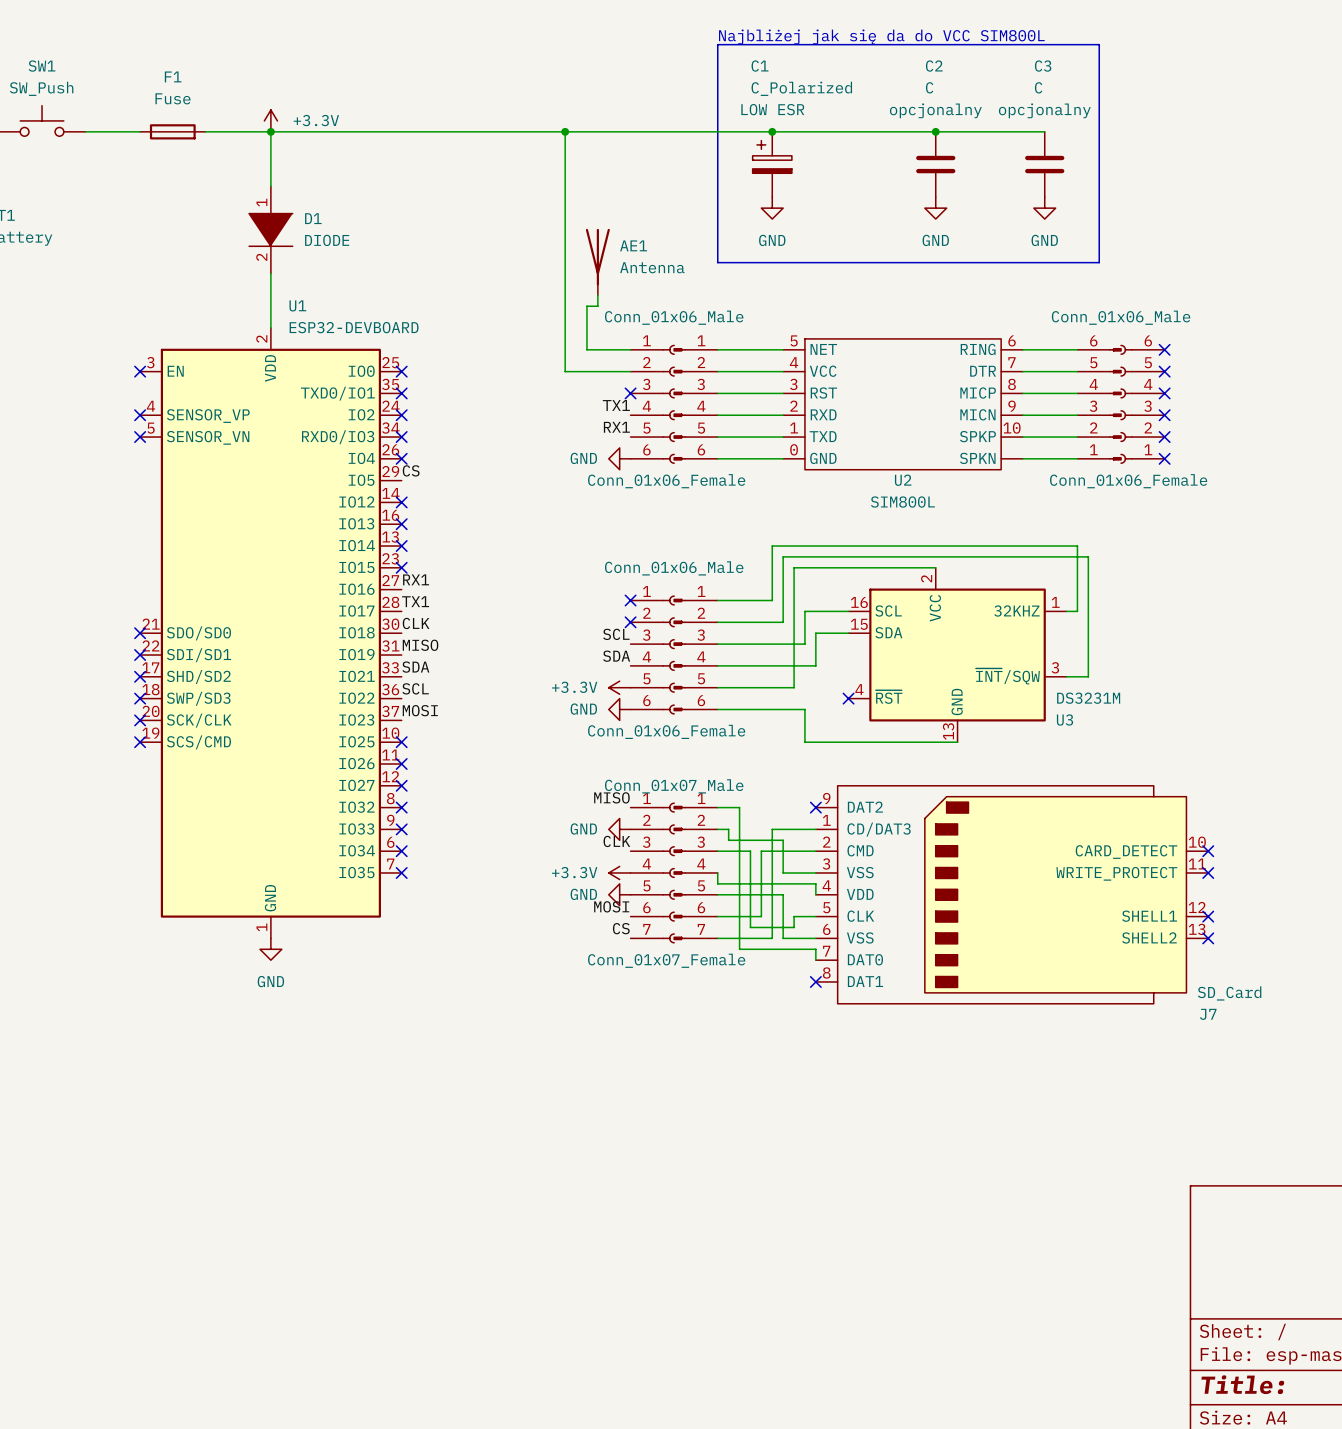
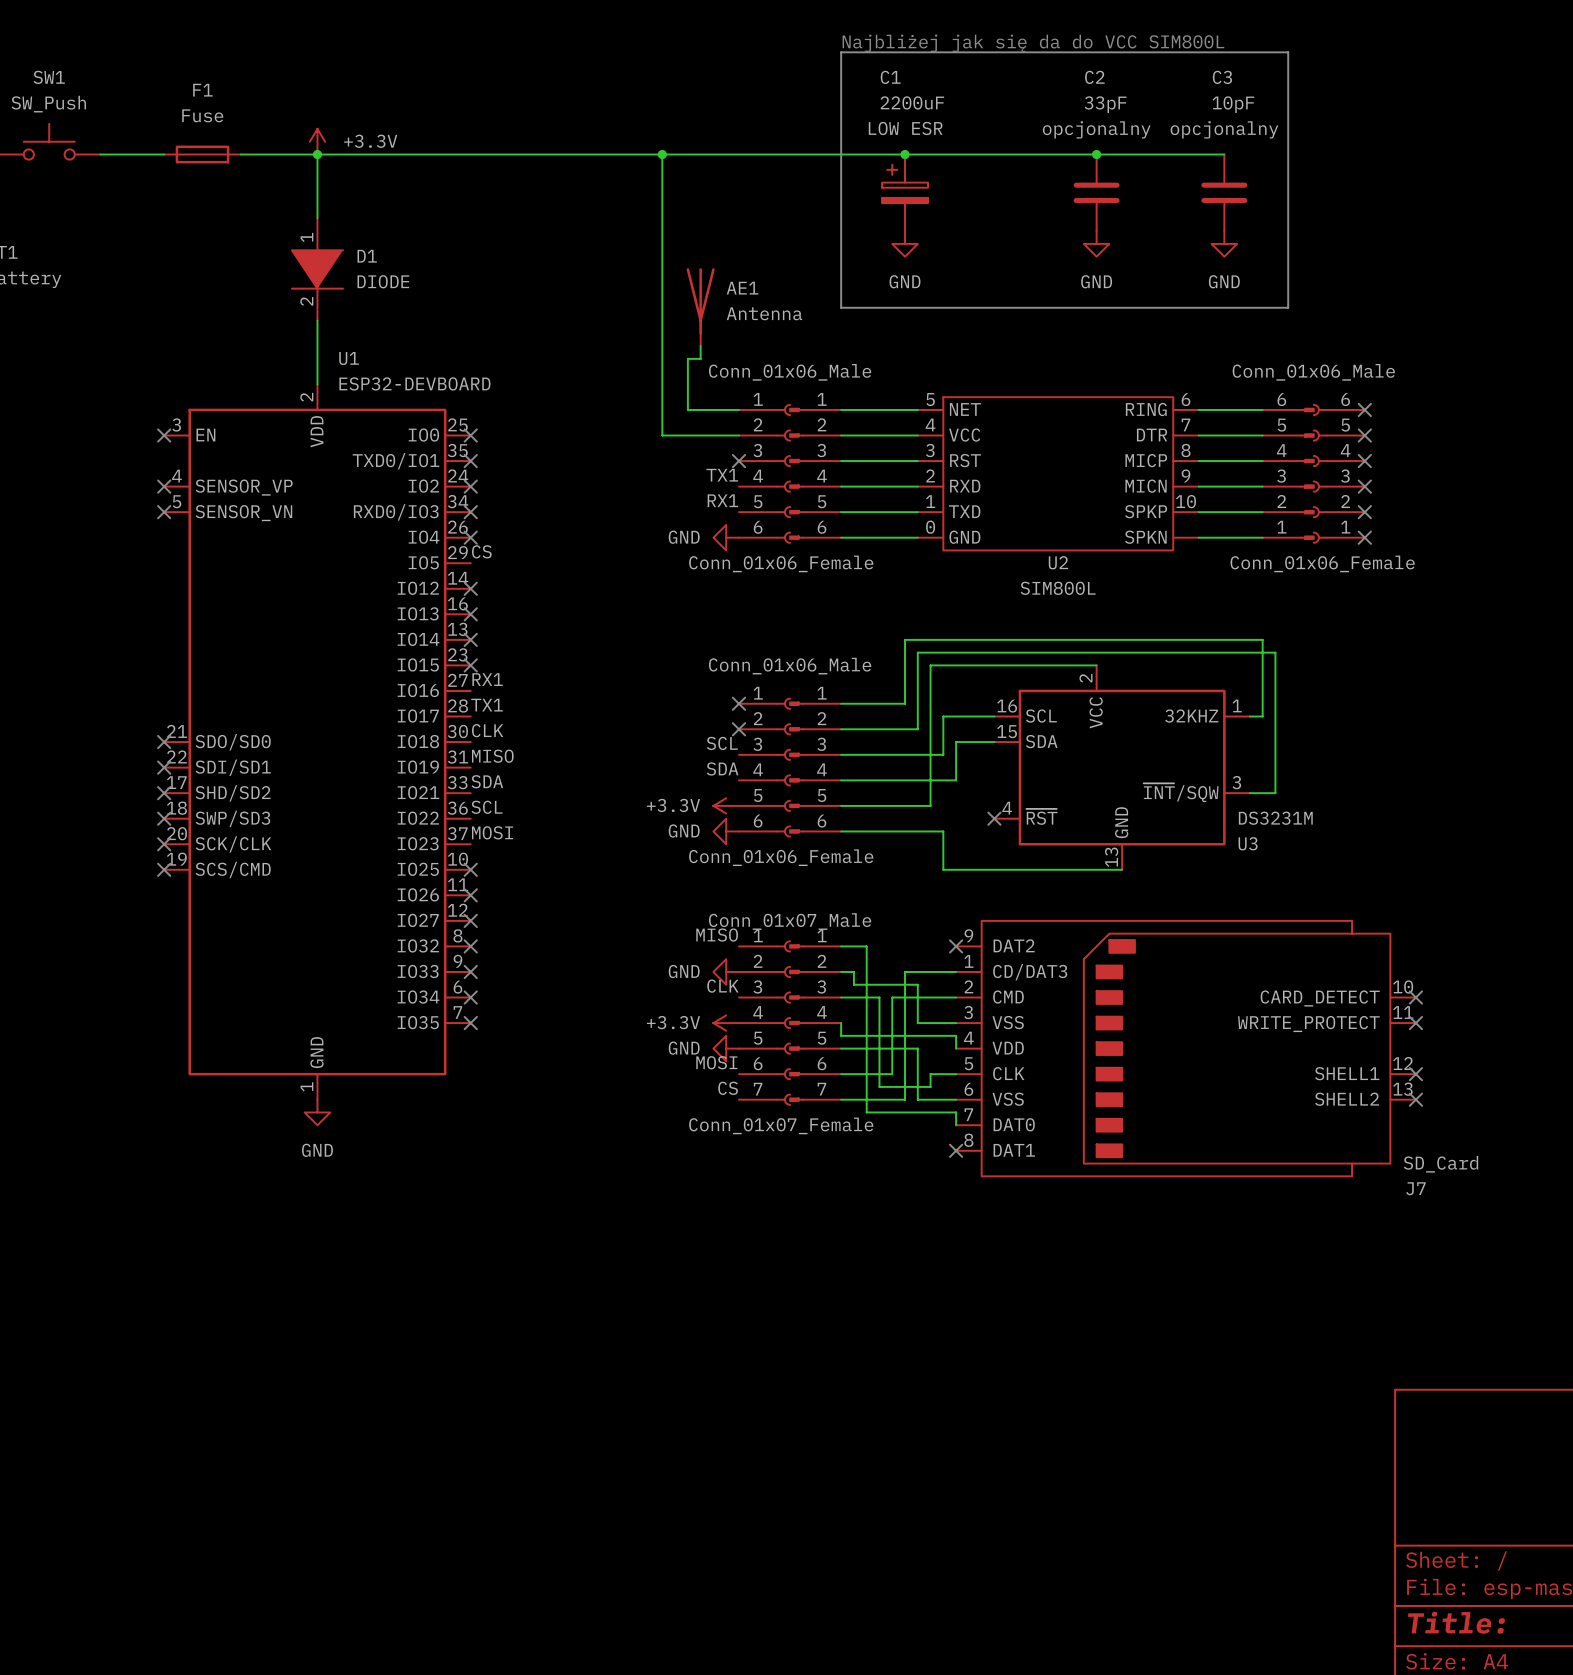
C2 value: C (929, 87) -> 33pF (1105, 104)
C3 value: C (1038, 87) -> 10pF (1233, 104)
C1 value: C_Polarized (801, 88) -> 2200uF (912, 102)

